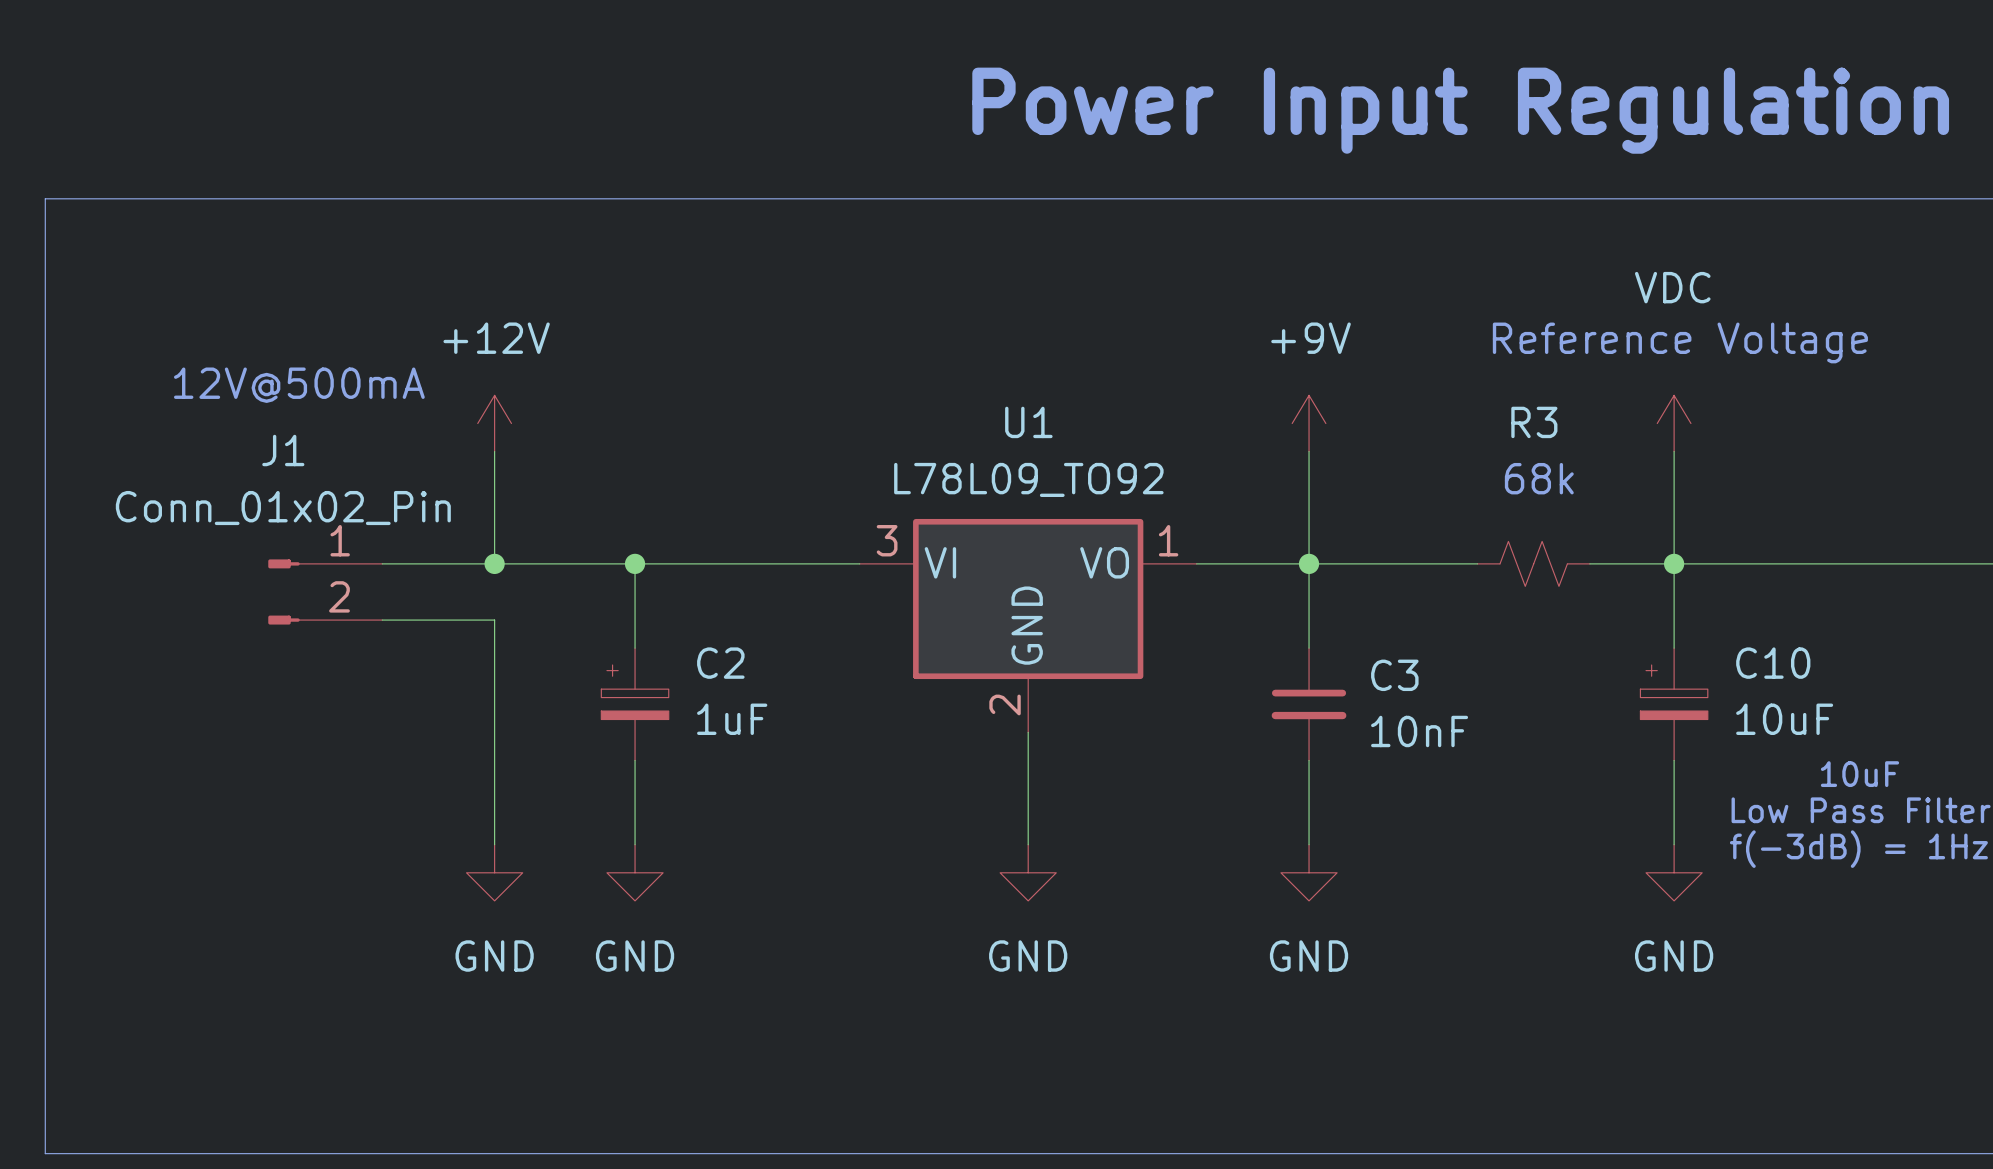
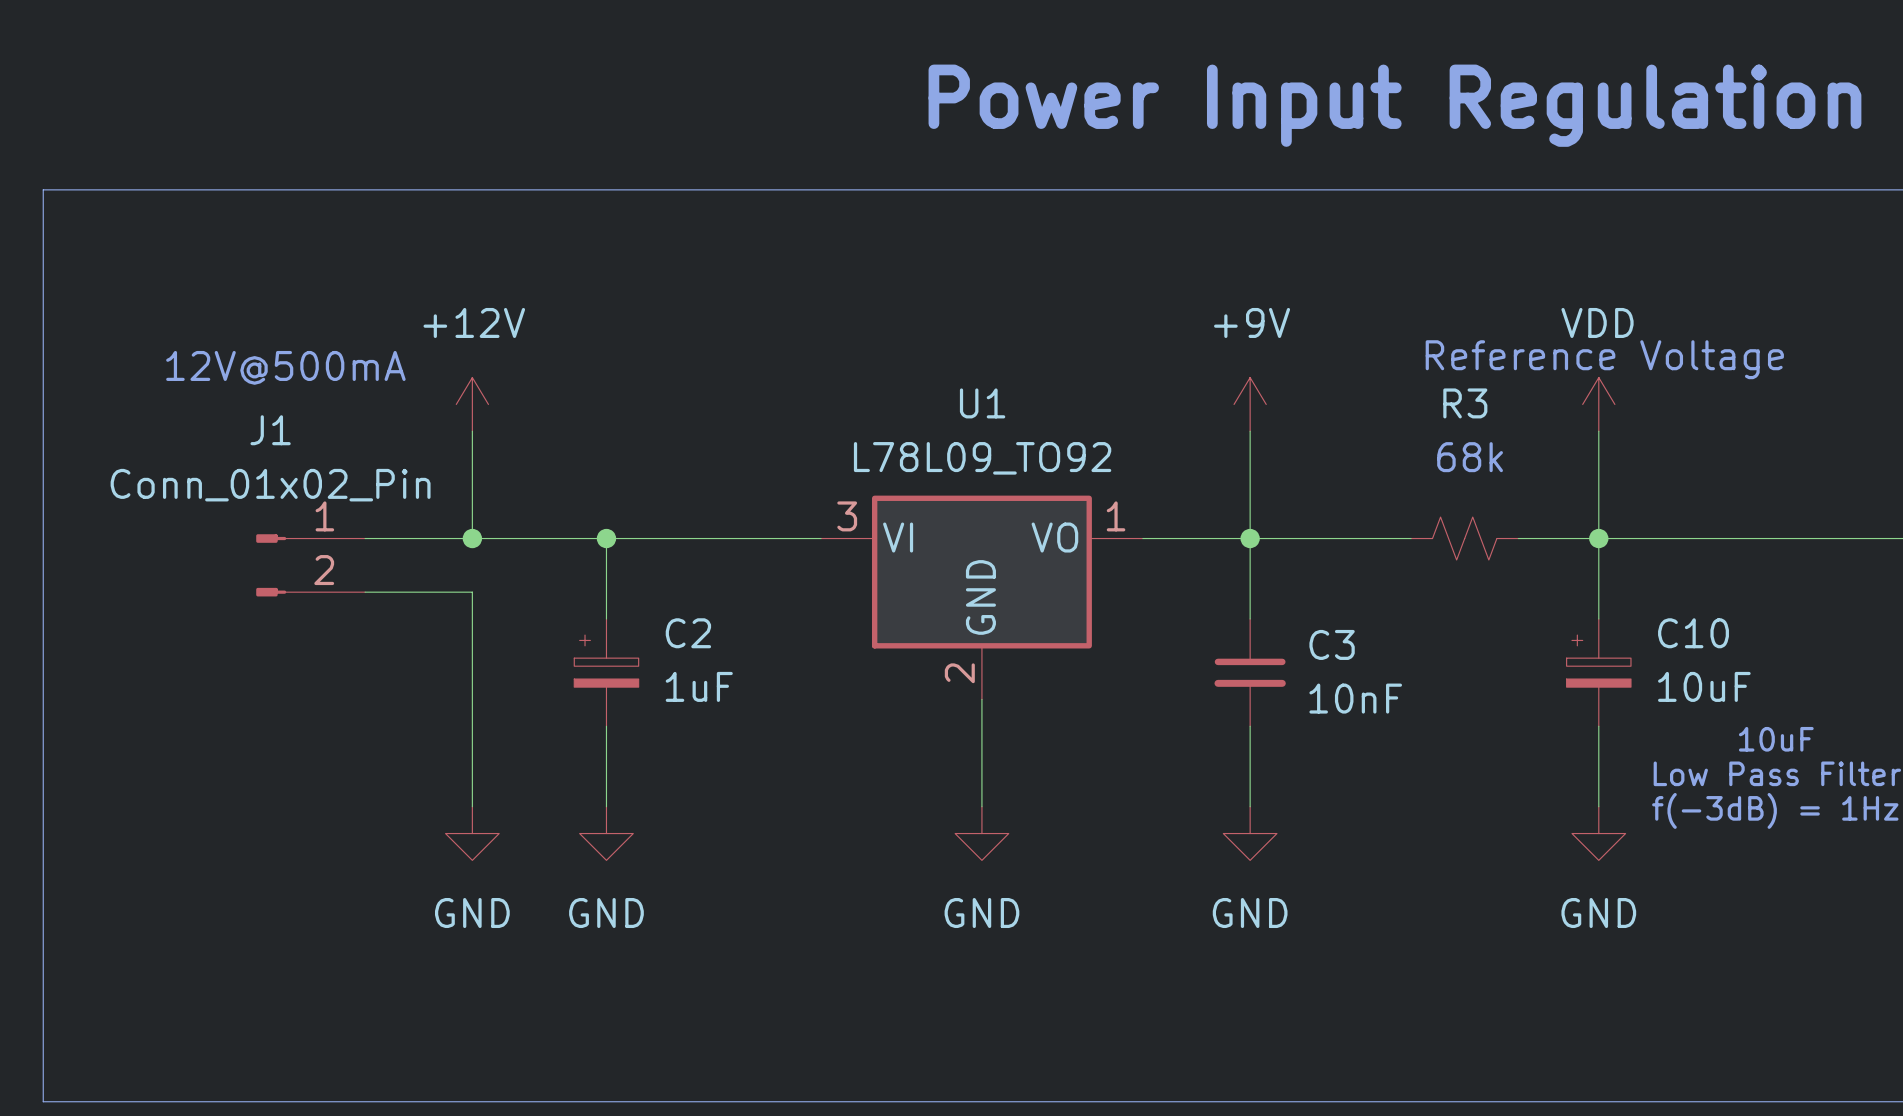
text position: Reference Voltage (1680, 342) -> Reference Voltage (1604, 359)
power symbol: VDC (1674, 423) -> VDD (1598, 404)

